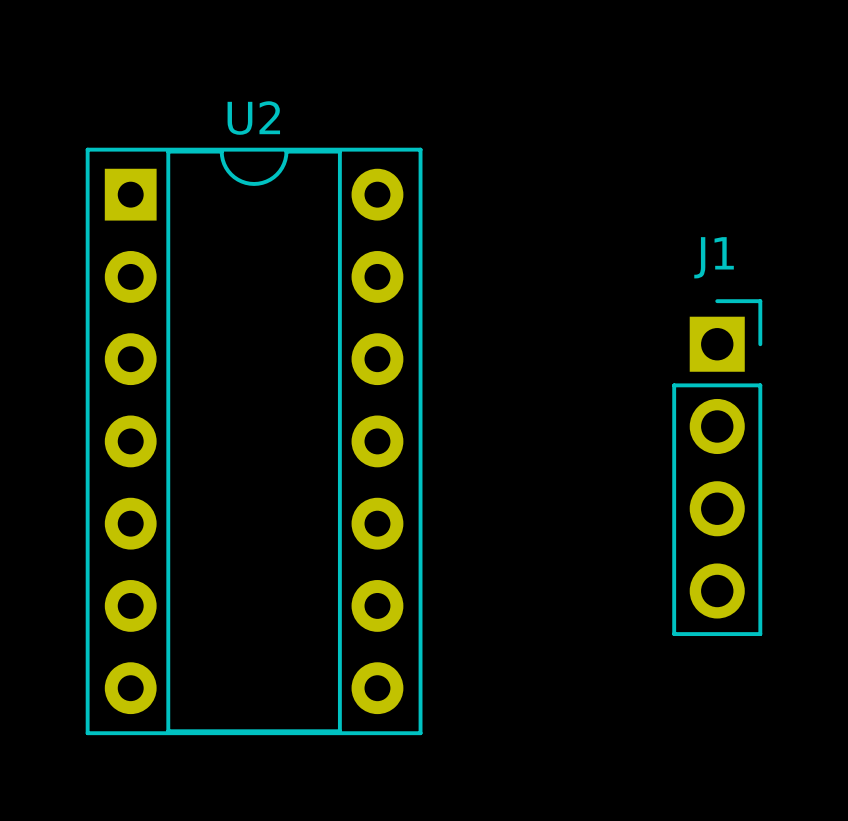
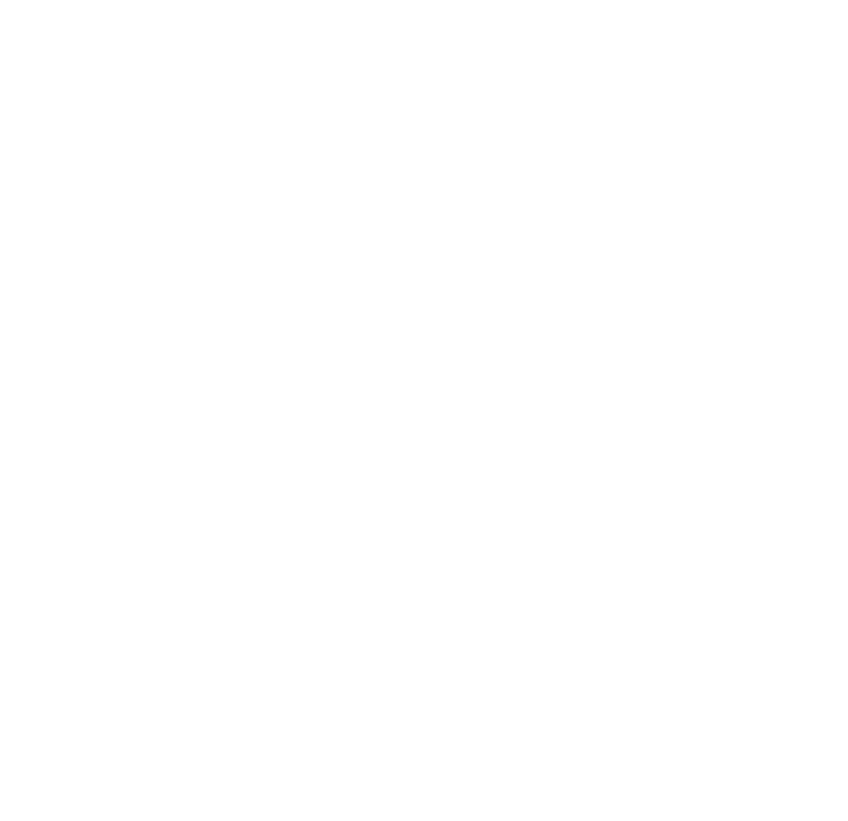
U2: (254, 441) -> none
J1: (717, 467) -> none

